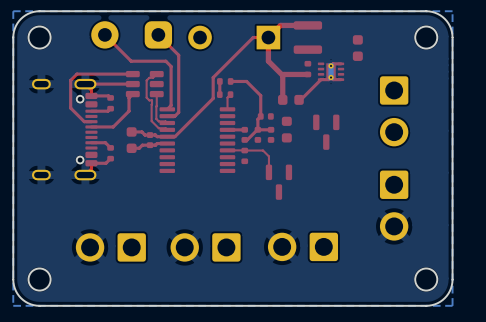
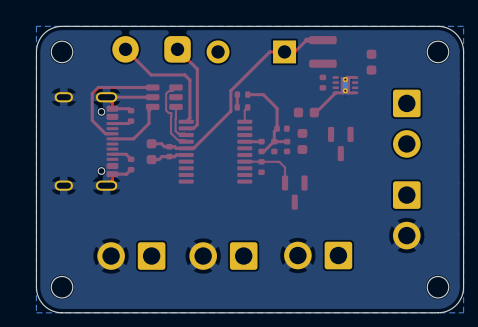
top track: (291, 25) (280, 25) (268, 37) (268, 61) (282, 75) -> (306, 40) (294, 51) (284, 51)
top track: (307, 74) (282, 75) -> none
top track: (282, 75) (282, 99) -> none

